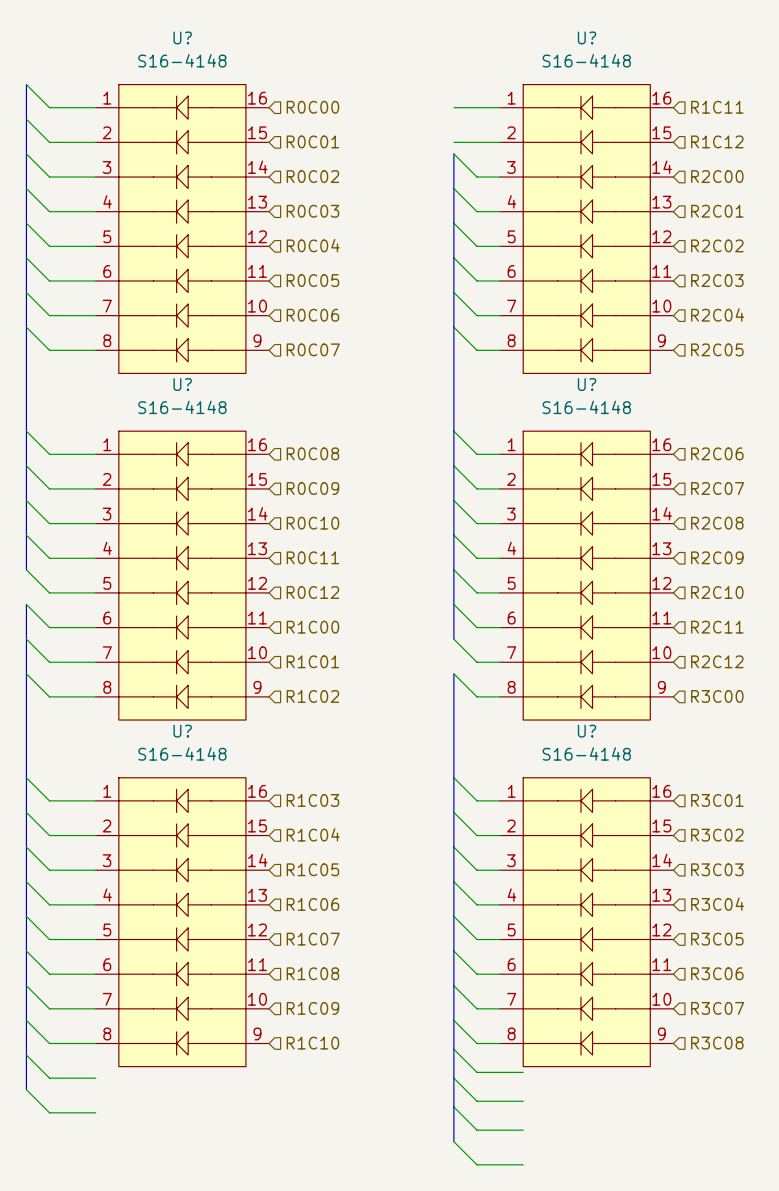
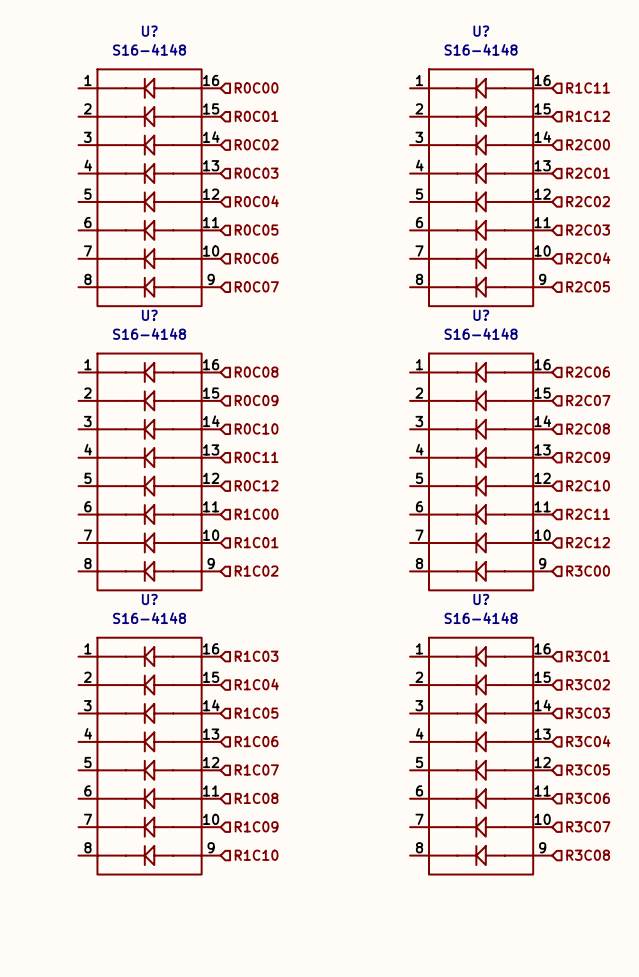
wire: (26, 84) (49, 107) (95, 107) -> none
bus: (26, 84) (26, 569) -> none
U? symbol: [95, 84, 270, 374] -> [78, 69, 221, 307]
U? symbol: [500, 84, 674, 374] -> [410, 69, 553, 307]
wire: (453, 107) (500, 107) -> none
wire: (26, 119) (49, 142) (95, 142) -> none
wire: (453, 142) (500, 142) -> none
wire: (26, 153) (49, 177) (95, 177) -> none
wire: (453, 153) (477, 177) (500, 177) -> none
bus: (453, 153) (453, 639) -> none
wire: (26, 188) (49, 211) (95, 211) -> none
wire: (453, 188) (477, 211) (500, 211) -> none
wire: (26, 223) (49, 246) (95, 246) -> none
wire: (453, 223) (477, 246) (500, 246) -> none
wire: (26, 257) (49, 281) (95, 281) -> none
wire: (453, 257) (477, 281) (500, 281) -> none
wire: (26, 292) (49, 315) (95, 315) -> none
wire: (453, 292) (477, 315) (500, 315) -> none
wire: (26, 327) (49, 350) (95, 350) -> none
wire: (453, 327) (477, 350) (500, 350) -> none
wire: (26, 431) (49, 454) (95, 454) -> none
U? symbol: [95, 431, 270, 721] -> [78, 353, 221, 591]
wire: (453, 431) (477, 454) (500, 454) -> none
U? symbol: [500, 431, 674, 721] -> [410, 353, 553, 591]
wire: (26, 465) (49, 488) (95, 488) -> none
wire: (453, 465) (477, 488) (500, 488) -> none
wire: (26, 500) (49, 523) (95, 523) -> none
wire: (453, 500) (477, 523) (500, 523) -> none
wire: (26, 535) (49, 558) (95, 558) -> none
wire: (453, 535) (477, 558) (500, 558) -> none
wire: (26, 569) (49, 592) (95, 592) -> none
wire: (453, 569) (477, 592) (500, 592) -> none
wire: (26, 604) (49, 627) (95, 627) -> none
bus: (26, 604) (26, 1089) -> none
wire: (453, 604) (477, 627) (500, 627) -> none
wire: (26, 639) (49, 662) (95, 662) -> none
wire: (453, 639) (477, 662) (500, 662) -> none
wire: (26, 673) (49, 696) (95, 696) -> none
wire: (453, 673) (477, 696) (500, 696) -> none
bus: (453, 673) (453, 1141) -> none
wire: (26, 777) (49, 800) (95, 800) -> none
U? symbol: [95, 777, 270, 1067] -> [78, 637, 221, 875]
wire: (453, 777) (477, 800) (500, 800) -> none
U? symbol: [500, 777, 674, 1067] -> [410, 637, 553, 875]
wire: (26, 812) (49, 835) (95, 835) -> none
wire: (453, 812) (477, 835) (500, 835) -> none
wire: (26, 847) (49, 870) (95, 870) -> none
wire: (453, 847) (477, 870) (500, 870) -> none
wire: (26, 881) (49, 904) (95, 904) -> none
wire: (453, 881) (477, 904) (500, 904) -> none
wire: (26, 916) (49, 939) (95, 939) -> none
wire: (453, 916) (477, 939) (500, 939) -> none
wire: (26, 951) (49, 974) (95, 974) -> none
wire: (453, 951) (477, 974) (500, 974) -> none
wire: (26, 985) (49, 1008) (95, 1008) -> none
wire: (453, 985) (477, 1008) (500, 1008) -> none
wire: (26, 1020) (49, 1043) (95, 1043) -> none
wire: (453, 1020) (477, 1043) (500, 1043) -> none
wire: (453, 1049) (477, 1072) -> none
wire: (26, 1055) (49, 1078) (95, 1078) -> none
wire: (477, 1072) (523, 1072) -> none
wire: (453, 1078) (477, 1101) (523, 1101) -> none
wire: (26, 1089) (49, 1112) (95, 1112) -> none
wire: (453, 1107) (477, 1130) -> none
wire: (477, 1130) (523, 1130) -> none
wire: (453, 1141) (477, 1164) -> none
wire: (477, 1164) (523, 1164) -> none

